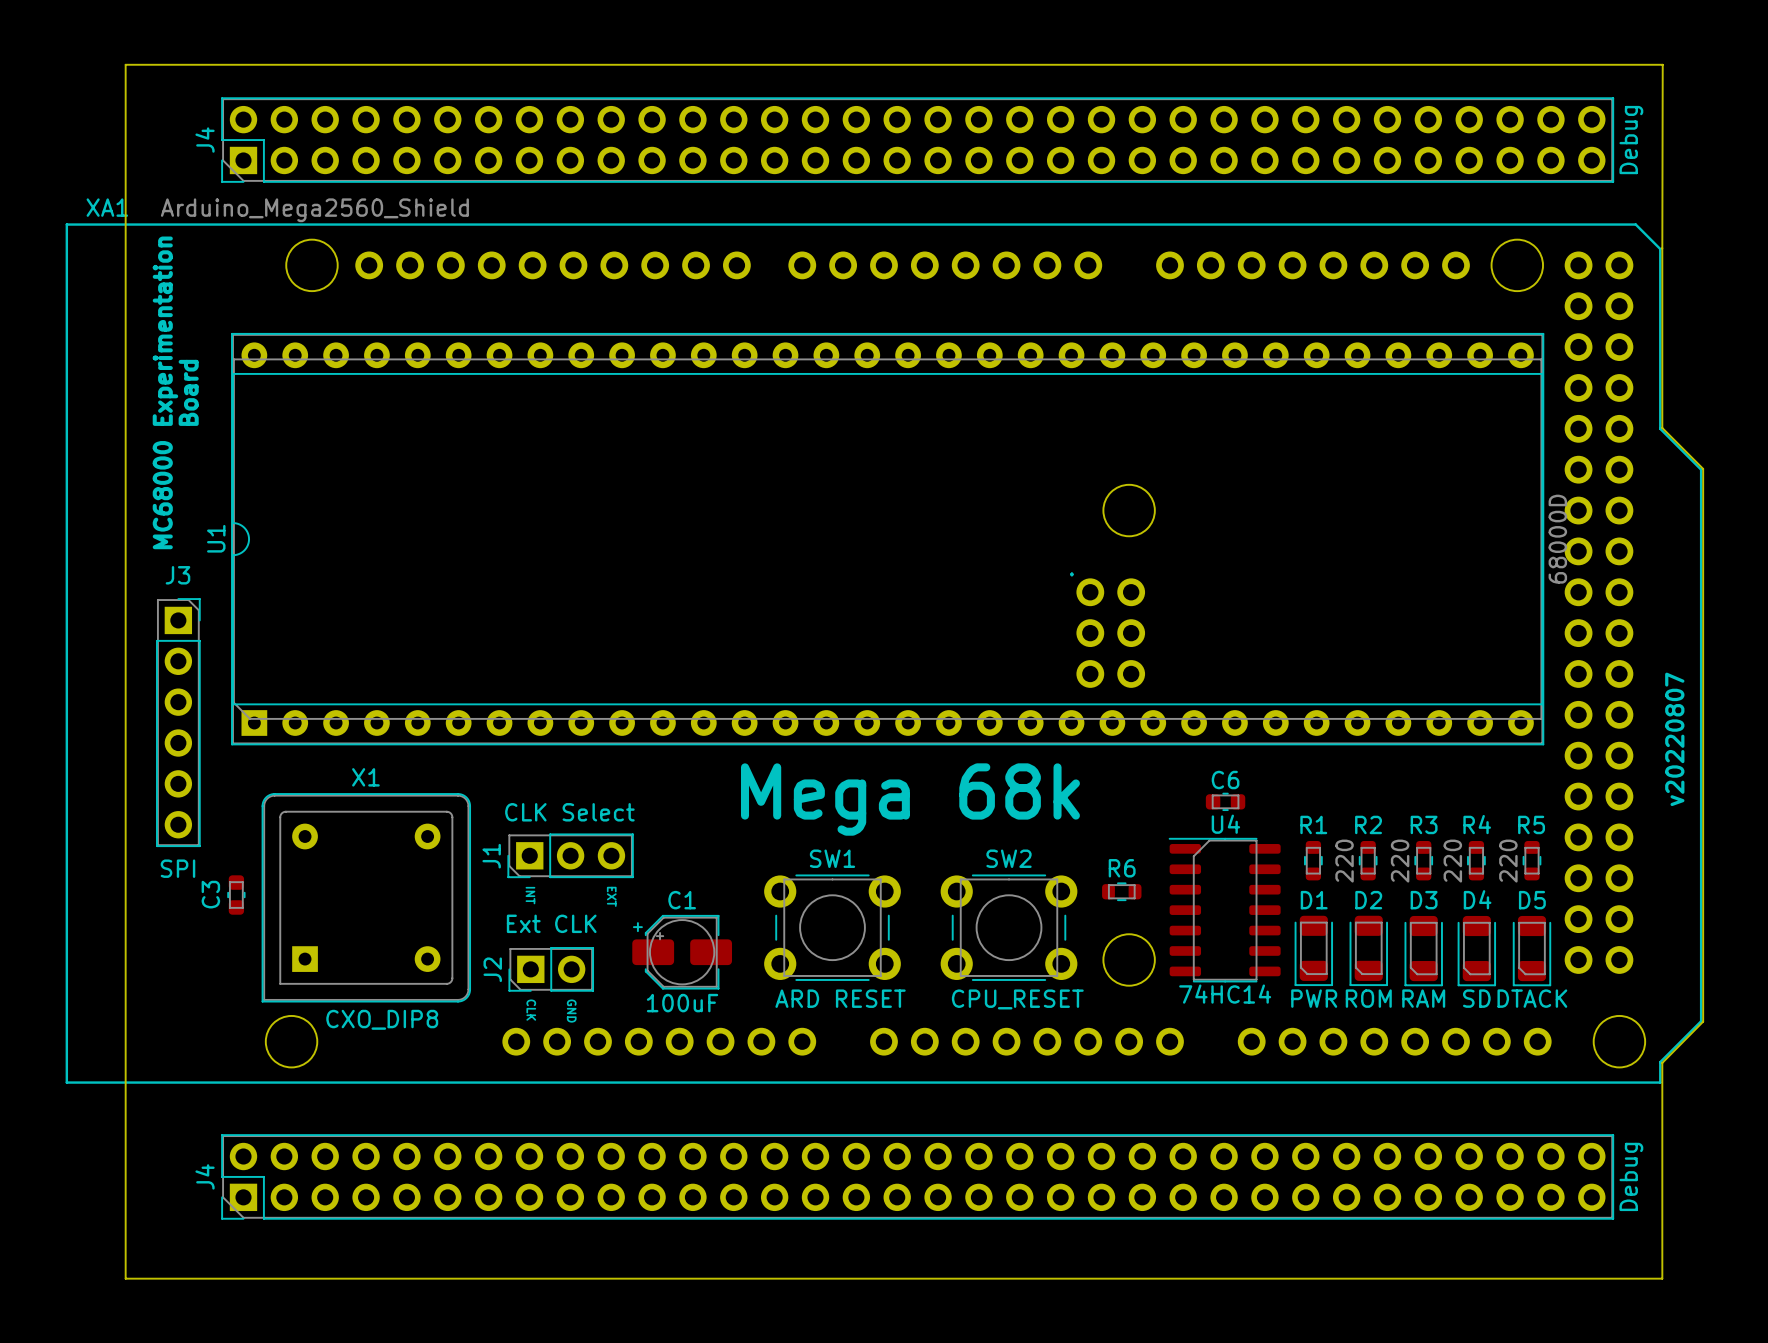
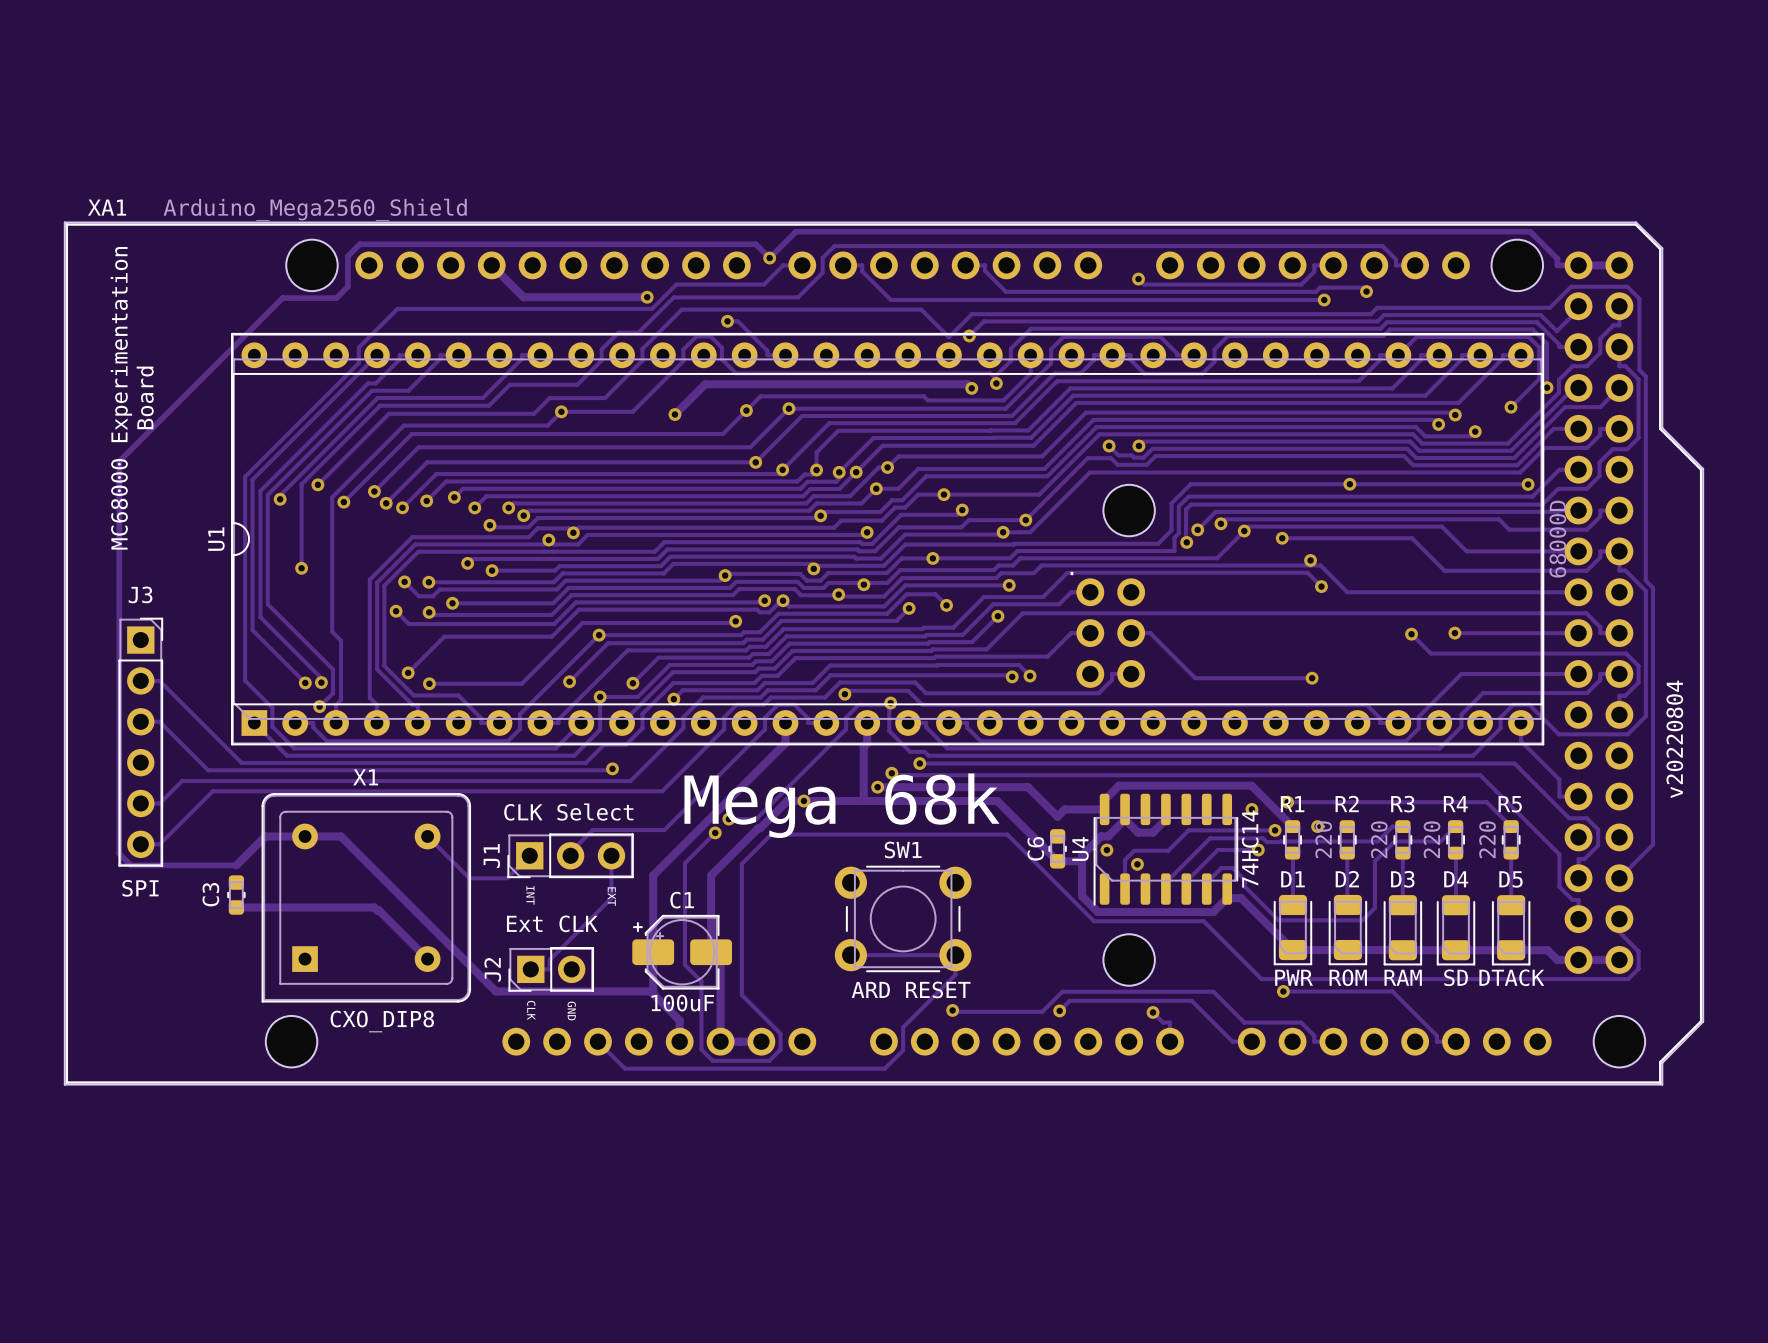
J4: Debug (917, 140) -> none
board edge: (1662, 248) (1662, 64) (125, 64) (125, 1278) (1662, 1278) (1662, 1084) -> (1662, 248) (1636, 222) (64, 222) (64, 1084) (1662, 1084)
via: none -> (769, 258)
track: none -> (491, 265) (523, 297) (647, 297)
track: none -> (802, 265) (783, 265) (764, 284) (676, 284) (652, 308) (397, 308) (358, 347) (358, 363) (245, 476) (245, 680) (272, 707) (272, 726) (294, 748) (555, 748) (581, 723)
track: none -> (843, 265) (862, 265) (862, 271) (890, 300) (1324, 300)
track: none -> (965, 265) (984, 265) (984, 270) (1005, 291) (1315, 291) (1320, 287) (1362, 287) (1366, 291)
track: none -> (1333, 265) (1314, 265) (1314, 271) (1301, 284) (1144, 284) (1138, 279)
track: none -> (1415, 265) (1396, 265) (1396, 259) (1382, 246) (834, 246) (822, 257) (822, 272) (798, 297) (673, 297) (638, 332) (618, 332) (601, 349) (601, 360) (577, 384) (509, 384) (489, 405) (380, 405) (301, 484) (301, 568)
track: none -> (1619, 265) (1557, 265) (1557, 258) (1530, 231) (796, 231) (769, 258) (755, 244) (359, 244) (347, 256) (347, 286) (336, 298) (282, 298) (119, 461) (119, 853) (130, 865) (236, 865) (265, 836) (340, 836) (495, 991) (653, 991)
via: none -> (1138, 279)
via: none -> (1366, 291)
via: none -> (647, 297)
via: none -> (1324, 300)
track: none -> (1578, 306) (1578, 309) (1556, 331) (1540, 315) (1384, 315) (1377, 321) (983, 321) (969, 335)
track: none -> (1619, 306) (1619, 325) (1613, 325) (1600, 338) (1600, 352) (1586, 366) (1572, 366) (1558, 379) (1558, 392) (1508, 443) (1422, 443) (1413, 434) (1099, 434) (1039, 494) (918, 494) (905, 507) (895, 507) (882, 520) (841, 520) (834, 527) (578, 527) (573, 532) (568, 528) (537, 528) (528, 537) (412, 537) (369, 579) (369, 697) (376, 704) (376, 723)
track: none -> (727, 321) (737, 321) (767, 350) (767, 355) (785, 355)
via: none -> (727, 321)
via: none -> (969, 335)
track: none -> (1578, 347) (1559, 347) (1559, 344) (1536, 322) (1387, 322) (1380, 328) (1030, 328) (1010, 348) (1010, 360) (994, 377)
track: none -> (1619, 347) (1619, 366) (1625, 366) (1638, 379) (1638, 437) (1627, 449) (1612, 449) (1599, 462) (1599, 476) (1586, 488) (1558, 488) (1542, 504) (1191, 504) (1186, 509) (1186, 542)
track: none -> (376, 355) (252, 479) (252, 630) (305, 682)
track: none -> (417, 355) (399, 355) (399, 359) (375, 383) (367, 383) (260, 490) (260, 617) (321, 678) (321, 682)
track: none -> (458, 355) (440, 355) (440, 358) (408, 390) (372, 390) (267, 494) (267, 604) (333, 669) (333, 693) (319, 706)
track: none -> (540, 355) (522, 355) (522, 358) (482, 397) (377, 397) (280, 495) (280, 499)
track: none -> (1030, 355) (1030, 373) (1003, 400) (927, 400) (923, 396) (760, 396) (722, 434) (411, 434) (343, 502)
track: none -> (1194, 355) (1177, 355) (1160, 336) (1063, 336) (1051, 349) (1051, 363) (1005, 408) (788, 408) (750, 447) (418, 447) (374, 491)
track: none -> (1439, 355) (1421, 355) (1421, 359) (1392, 388) (1070, 388) (1028, 430) (838, 430) (816, 452) (816, 470) (812, 474) (804, 474) (797, 481) (446, 481) (426, 500)
track: none -> (1480, 355) (1462, 355) (1462, 359) (1425, 395) (1073, 395) (1031, 437) (873, 437) (839, 472) (839, 478) (836, 481) (807, 481) (800, 488) (462, 488) (454, 497)
track: none -> (1520, 355) (1502, 355) (1502, 358) (1458, 402) (1076, 402) (1033, 445) (882, 445) (839, 488) (810, 488) (803, 496) (486, 496) (474, 507)
track: none -> (994, 377) (990, 373) (735, 373) (721, 359) (721, 347) (710, 336) (696, 336) (683, 349) (683, 361) (632, 411) (561, 411) (547, 425) (403, 425) (332, 497) (332, 631) (341, 640) (341, 699) (336, 704) (336, 723)
via: none -> (996, 383)
track: none -> (1547, 387) (1547, 343) (1532, 329) (1390, 329) (1383, 335) (1228, 335) (1214, 349) (1214, 361) (1202, 373) (1144, 373) (1130, 359) (1130, 355) (1094, 355) (1094, 359) (1080, 373) (1054, 373) (1012, 415) (802, 415) (755, 462) (427, 462) (386, 503)
via: none -> (1547, 387)
track: none -> (1578, 387) (1574, 387) (1511, 450) (1419, 450) (1410, 441) (1143, 441) (1138, 445)
track: none -> (1619, 387) (1600, 407) (1565, 407) (1514, 458) (1416, 458) (1407, 448) (1152, 448) (1143, 457) (1134, 457) (1131, 455) (1118, 455) (1109, 445)
track: none -> (971, 388) (967, 384) (705, 384) (674, 414)
via: none -> (971, 388)
text position: MC68000 Experimentation (165, 392) -> MC68000 Experimentation (121, 398)
text position: Board (188, 392) -> Board (145, 397)
track: none -> (1510, 407) (1539, 379) (1539, 347) (1528, 336) (1416, 336) (1398, 355) (1380, 355) (1380, 359) (1358, 381) (1057, 381) (1015, 423) (829, 423) (778, 474) (436, 474) (402, 507)
via: none -> (1510, 407)
via: none -> (788, 408)
via: none -> (746, 410)
via: none -> (561, 411)
via: none -> (674, 414)
track: none -> (1455, 415) (1452, 412) (1085, 412) (1042, 456) (898, 456) (887, 467) (878, 467) (850, 496) (813, 496) (806, 503) (513, 503) (508, 507)
via: none -> (1455, 415)
track: none -> (1438, 424) (1434, 419) (1093, 419) (1044, 469) (918, 469) (898, 488) (876, 488) (861, 503) (816, 503) (809, 510) (528, 510) (523, 515)
via: none -> (1438, 424)
track: none -> (1578, 428) (1553, 428) (1517, 465) (1413, 465) (1404, 456) (1155, 456) (1146, 464) (1117, 464) (1111, 458) (1087, 458) (1025, 520) (968, 520) (961, 527) (898, 527) (874, 551) (859, 551) (857, 549) (667, 549) (657, 558) (472, 558) (467, 563)
track: none -> (1619, 428) (1600, 428) (1600, 434) (1587, 447) (1544, 447) (1520, 472) (1089, 472) (1030, 532) (1003, 532) (1000, 534) (904, 534) (881, 558) (856, 558) (854, 556) (670, 556) (660, 566) (559, 566) (555, 570) (492, 570)
track: none -> (1475, 431) (1470, 436) (1425, 436) (1416, 427) (1096, 427) (1047, 476) (926, 476) (902, 500) (892, 500) (880, 512) (824, 512) (818, 517) (537, 517) (528, 527) (491, 527) (489, 525)
via: none -> (1475, 431)
via: none -> (1109, 445)
via: none -> (1138, 445)
via: none -> (755, 462)
via: none -> (887, 467)
via: none -> (782, 469)
track: none -> (1578, 469) (1559, 469) (1532, 496) (1188, 496) (1178, 506) (1178, 533) (1174, 537) (1174, 551) (1017, 551) (1010, 558) (933, 558)
via: none -> (816, 470)
via: none -> (839, 472)
via: none -> (856, 472)
track: none -> (317, 484) (388, 413) (534, 413) (549, 398) (604, 398) (642, 360) (642, 348) (681, 309) (921, 309) (948, 337) (971, 314) (1370, 314) (1377, 307) (1550, 307) (1571, 286) (1627, 286) (1639, 298) (1639, 370) (1645, 376) (1645, 580) (1653, 587) (1653, 844) (1619, 878)
via: none -> (317, 484)
via: none -> (1349, 484)
track: none -> (1528, 484) (1190, 484) (1171, 503) (1171, 530) (1158, 543) (905, 544) (884, 565) (813, 566)
via: none -> (1528, 484)
via: none -> (876, 488)
via: none -> (374, 491)
via: none -> (943, 494)
via: none -> (454, 497)
via: none -> (280, 499)
via: none -> (426, 500)
via: none -> (343, 502)
via: none -> (386, 503)
via: none -> (402, 507)
via: none -> (474, 507)
via: none -> (508, 507)
track: none -> (962, 510) (957, 514) (901, 514) (871, 544) (862, 544) (860, 542) (664, 542) (654, 551) (418, 551) (384, 585) (384, 665) (413, 695) (458, 695) (481, 718) (481, 723) (499, 723)
via: none -> (962, 510)
track: none -> (1578, 510) (1215, 511) (1197, 529)
track: none -> (1619, 510) (1600, 510) (1600, 516) (1587, 529) (1509, 529) (1498, 519) (1225, 519) (1220, 523)
via: none -> (523, 515)
via: none -> (820, 515)
via: none -> (1025, 520)
via: none -> (1220, 523)
via: none -> (489, 525)
via: none -> (1197, 529)
via: none -> (1244, 531)
via: none -> (573, 532)
track: none -> (867, 532) (864, 534) (587, 534) (578, 544) (553, 544) (548, 540) (544, 544) (415, 544) (377, 582) (377, 669) (412, 704) (417, 704) (417, 723)
via: none -> (867, 532)
via: none -> (1003, 532)
track: none -> (1282, 538) (1412, 538) (1444, 570) (1586, 570) (1600, 557) (1600, 551) (1619, 551) (1619, 570) (1625, 570) (1645, 590) (1645, 716) (1627, 734) (1558, 734) (1529, 704) (1513, 704) (1500, 717) (1500, 728) (1473, 755) (928, 755) (924, 751) (910, 751) (889, 731) (890, 703)
via: none -> (1282, 538)
via: none -> (548, 540)
via: none -> (1186, 542)
track: none -> (1578, 551) (1466, 551) (1441, 526) (1248, 526) (1217, 558) (1020, 558) (1013, 565) (998, 565) (994, 570) (900, 570) (887, 582) (828, 582) (823, 587) (803, 587) (797, 581) (736, 581) (729, 587) (568, 587) (553, 603) (452, 603)
track: none -> (932, 558) (901, 558) (887, 573) (828, 573) (820, 580) (806, 580) (800, 573) (726, 573) (720, 580) (565, 580) (556, 589) (439, 589) (432, 596) (418, 596) (404, 581)
via: none -> (932, 558)
via: none -> (1310, 560)
via: none -> (467, 563)
track: none -> (813, 566) (811, 563) (673, 563) (663, 573) (562, 573) (553, 582) (428, 582)
via: none -> (301, 568)
via: none -> (813, 568)
via: none -> (492, 570)
via: none -> (725, 575)
via: none -> (404, 581)
via: none -> (428, 582)
via: none -> (863, 584)
track: none -> (1009, 585) (905, 585) (884, 606) (788, 606) (781, 600) (769, 612) (759, 612) (757, 609) (578, 609) (551, 636) (444, 636) (408, 672)
via: none -> (1009, 585)
track: none -> (1321, 586) (1307, 572) (1067, 572) (1043, 597) (983, 597) (953, 627) (783, 629) (765, 646) (749, 646) (746, 650) (627, 650) (558, 719) (558, 723) (540, 723)
via: none -> (1321, 586)
track: none -> (1090, 592) (1071, 592) (1059, 604) (993, 604) (962, 634) (786, 636) (768, 654) (752, 654) (749, 657) (658, 657) (632, 683)
track: none -> (1578, 592) (1347, 592) (1320, 565) (1041, 565) (1033, 573) (1001, 573) (996, 578) (902, 578) (884, 596) (801, 595) (794, 589) (739, 589) (732, 595) (571, 595) (551, 614) (431, 614) (429, 612)
via: none -> (838, 594)
track: none -> (764, 600) (762, 602) (575, 602) (554, 624) (408, 624) (396, 611)
via: none -> (764, 600)
via: none -> (783, 600)
via: none -> (452, 603)
track: none -> (946, 605) (935, 594) (906, 594) (887, 613) (778, 613) (759, 632) (743, 632) (741, 635) (599, 635) (519, 714) (519, 729) (507, 741) (326, 741) (313, 727) (313, 723) (295, 723)
via: none -> (946, 605)
track: none -> (909, 608) (896, 620) (781, 620) (762, 639) (746, 639) (743, 643) (608, 643) (569, 681)
via: none -> (909, 608)
via: none -> (396, 611)
via: none -> (429, 612)
track: none -> (997, 616) (972, 642) (789, 643) (771, 661) (755, 661) (752, 664) (669, 664) (637, 696) (600, 696) (600, 729) (574, 755) (287, 755) (254, 723)
via: none -> (997, 616)
track: none -> (735, 621) (733, 623) (582, 623) (521, 683) (429, 683)
via: none -> (735, 621)
track: none -> (1090, 633) (1071, 633) (1047, 656) (795, 658) (777, 675) (761, 675) (754, 683) (673, 683) (642, 713) (642, 728) (625, 744) (603, 744) (585, 762) (241, 762) (159, 680) (140, 680)
track: none -> (1131, 633) (1150, 633) (1195, 678) (1312, 678)
track: none -> (1454, 633) (1578, 633)
via: none -> (1454, 633)
track: none -> (1619, 633) (1600, 633) (1600, 627) (1586, 613) (1022, 613) (986, 649) (792, 650) (774, 668) (758, 668) (755, 672) (672, 672) (622, 723)
track: none -> (1411, 634) (1430, 653) (1626, 653) (1638, 665) (1638, 682) (1625, 695) (1619, 695) (1619, 714)
via: none -> (1411, 634)
via: none -> (599, 635)
via: none -> (408, 672)
track: none -> (1131, 673) (1112, 673) (1112, 679) (1098, 693) (926, 693) (915, 682) (840, 682) (825, 697) (770, 697) (763, 704) (736, 704) (724, 717) (724, 729) (662, 791) (212, 791) (159, 844) (140, 844)
track: none -> (1578, 673) (1461, 673) (1418, 716) (1418, 728) (1405, 741) (980, 741) (967, 727) (967, 723) (948, 723)
track: none -> (1619, 673) (1600, 673) (1600, 679) (1587, 693) (1482, 693) (1461, 714) (1461, 726) (1439, 748) (947, 748) (926, 727) (926, 723) (908, 723)
track: none -> (1012, 676) (1010, 675) (830, 675) (815, 690) (767, 690) (760, 697) (703, 697) (683, 717) (683, 728) (630, 781) (182, 781) (159, 803) (140, 803)
via: none -> (1012, 676)
track: none -> (1030, 676) (1018, 664) (830, 665) (812, 683) (764, 683) (757, 690) (682, 690) (673, 699)
via: none -> (1030, 676)
via: none -> (1312, 678)
via: none -> (569, 681)
via: none -> (305, 682)
via: none -> (321, 682)
via: none -> (429, 683)
via: none -> (632, 683)
track: none -> (844, 694) (848, 690) (908, 690) (922, 704) (1366, 704) (1380, 718) (1380, 723) (1398, 723)
via: none -> (844, 694)
via: none -> (600, 696)
via: none -> (673, 699)
via: none -> (890, 703)
track: none -> (889, 704) (858, 704) (846, 717) (846, 729) (756, 819) (728, 819)
via: none -> (319, 706)
track: none -> (140, 721) (159, 721) (208, 770) (612, 768)
J3 position: (178, 722) -> (140, 742)
track: none -> (785, 723) (785, 743) (653, 875) (653, 994) (679, 1020) (679, 1041)
track: none -> (826, 723) (808, 723) (808, 718) (794, 704) (777, 704) (765, 717) (765, 729) (664, 830) (592, 830) (570, 852) (570, 855)
track: none -> (867, 723) (867, 743) (863, 746) (863, 801)
track: none -> (1520, 723) (1520, 741) (1559, 779) (1559, 796) (1578, 796)
text: v20220807 (1674, 739) -> v20220804 (1674, 739)
track: none -> (919, 763) (1514, 763) (1569, 818) (1586, 818) (1598, 829) (1598, 845) (1584, 859) (1578, 859) (1578, 878)
via: none -> (919, 763)
via: none -> (612, 768)
track: none -> (891, 773) (893, 775) (1480, 775) (1559, 854) (1559, 886) (1572, 900) (1578, 900) (1578, 919)
via: none -> (891, 773)
track: none -> (877, 787) (1028, 787) (1057, 816) (1064, 809) (1104, 809) (1104, 800) (1118, 785) (1251, 785) (1292, 826)
via: none -> (877, 787)
text position: Mega 68k (910, 799) -> Mega 68k (841, 805)
via: none -> (803, 801)
C6 rotation: 0° (1225, 801) -> 90° clockwise (1057, 848)
C6 position: (1225, 801) -> (1057, 848)
track: none -> (1287, 802) (1486, 802) (1511, 826)
via: none -> (1287, 802)
track: none -> (1165, 809) (1165, 819) (1152, 832) (1138, 832) (1125, 819)
via: none -> (1251, 809)
via: none -> (728, 819)
track: none -> (1125, 819) (1108, 836) (1101, 836) (1082, 855) (1082, 896) (1097, 912) (1213, 912) (1227, 898)
via: none -> (1317, 826)
track: none -> (1402, 826) (1392, 826) (1377, 841) (1266, 842) (1263, 838) (1210, 838) (1165, 882) (1165, 889)
track: none -> (1455, 826) (1440, 841) (1394, 841) (1374, 861) (1374, 907) (1362, 920) (1278, 920) (1244, 886) (1244, 880) (1232, 868) (1221, 868) (1206, 882) (1206, 889)
track: none -> (1275, 830) (1188, 830) (1168, 850) (1134, 850) (1125, 860) (1125, 889)
via: none -> (1275, 830)
track: none -> (715, 832) (684, 863) (684, 964) (701, 981) (701, 1049) (712, 1060) (769, 1060) (780, 1049) (780, 1033) (741, 995) (741, 863) (771, 834) (1007, 834) (1094, 921) (1203, 921) (1261, 979) (1628, 979) (1638, 968) (1638, 951) (1619, 932) (1619, 919)
via: none -> (715, 832)
track: none -> (427, 836) (469, 878) (507, 878) (529, 855)
via: none -> (1106, 850)
track: none -> (1258, 850) (1217, 850) (1186, 881) (1186, 889)
via: none -> (1258, 850)
track: none -> (1292, 853) (1292, 904)
track: none -> (1347, 853) (1347, 904)
track: none -> (1402, 853) (1402, 905)
track: none -> (1455, 853) (1455, 905)
track: none -> (1511, 853) (1511, 905)
track: none -> (611, 855) (611, 898) (549, 959) (549, 969) (530, 969)
R1 position: (1313, 860) -> (1292, 839)
R2 position: (1368, 860) -> (1347, 839)
R3 position: (1423, 860) -> (1402, 839)
R4 position: (1476, 860) -> (1455, 839)
R5 position: (1531, 860) -> (1511, 839)
track: none -> (1082, 861) (1057, 861) (997, 801) (787, 801) (711, 875) (711, 952) (720, 961) (720, 1041) (761, 1041)
via: none -> (1137, 864)
R6: (1121, 891) -> none
track: none -> (1227, 898) (1241, 898) (1292, 950) (1402, 950)
track: none -> (236, 907) (374, 907) (427, 959)
U4 rotation: 0° (1224, 910) -> 90° counterclockwise (1165, 849)
SW1 position: (832, 927) -> (903, 918)
SW2: CPU_RESET (1009, 927) -> none
D1 position: (1313, 950) -> (1292, 930)
D2 position: (1368, 950) -> (1347, 930)
track: none -> (1402, 950) (1547, 950) (1557, 959) (1619, 959)
D3 position: (1423, 951) -> (1402, 930)
D4 position: (1476, 951) -> (1455, 930)
D5 position: (1531, 951) -> (1511, 930)
track: none -> (850, 955) (955, 955) (955, 974) (903, 1027) (903, 1050) (884, 1068) (624, 1068) (597, 1041)
track: none -> (1283, 991) (1392, 991) (1436, 1035) (1436, 1041) (1455, 1041)
via: none -> (1283, 991)
track: none -> (952, 1010) (1042, 1011) (1062, 991) (1213, 991) (1244, 1022) (1301, 1022) (1314, 1035) (1314, 1041) (1333, 1041)
via: none -> (952, 1010)
track: none -> (1059, 1010) (1069, 1000) (1191, 1000) (1232, 1041) (1251, 1041)
via: none -> (1059, 1010)
track: none -> (1153, 1012) (1163, 1022) (1169, 1022) (1169, 1041)
via: none -> (1153, 1012)
J4: Debug (917, 1176) -> none

